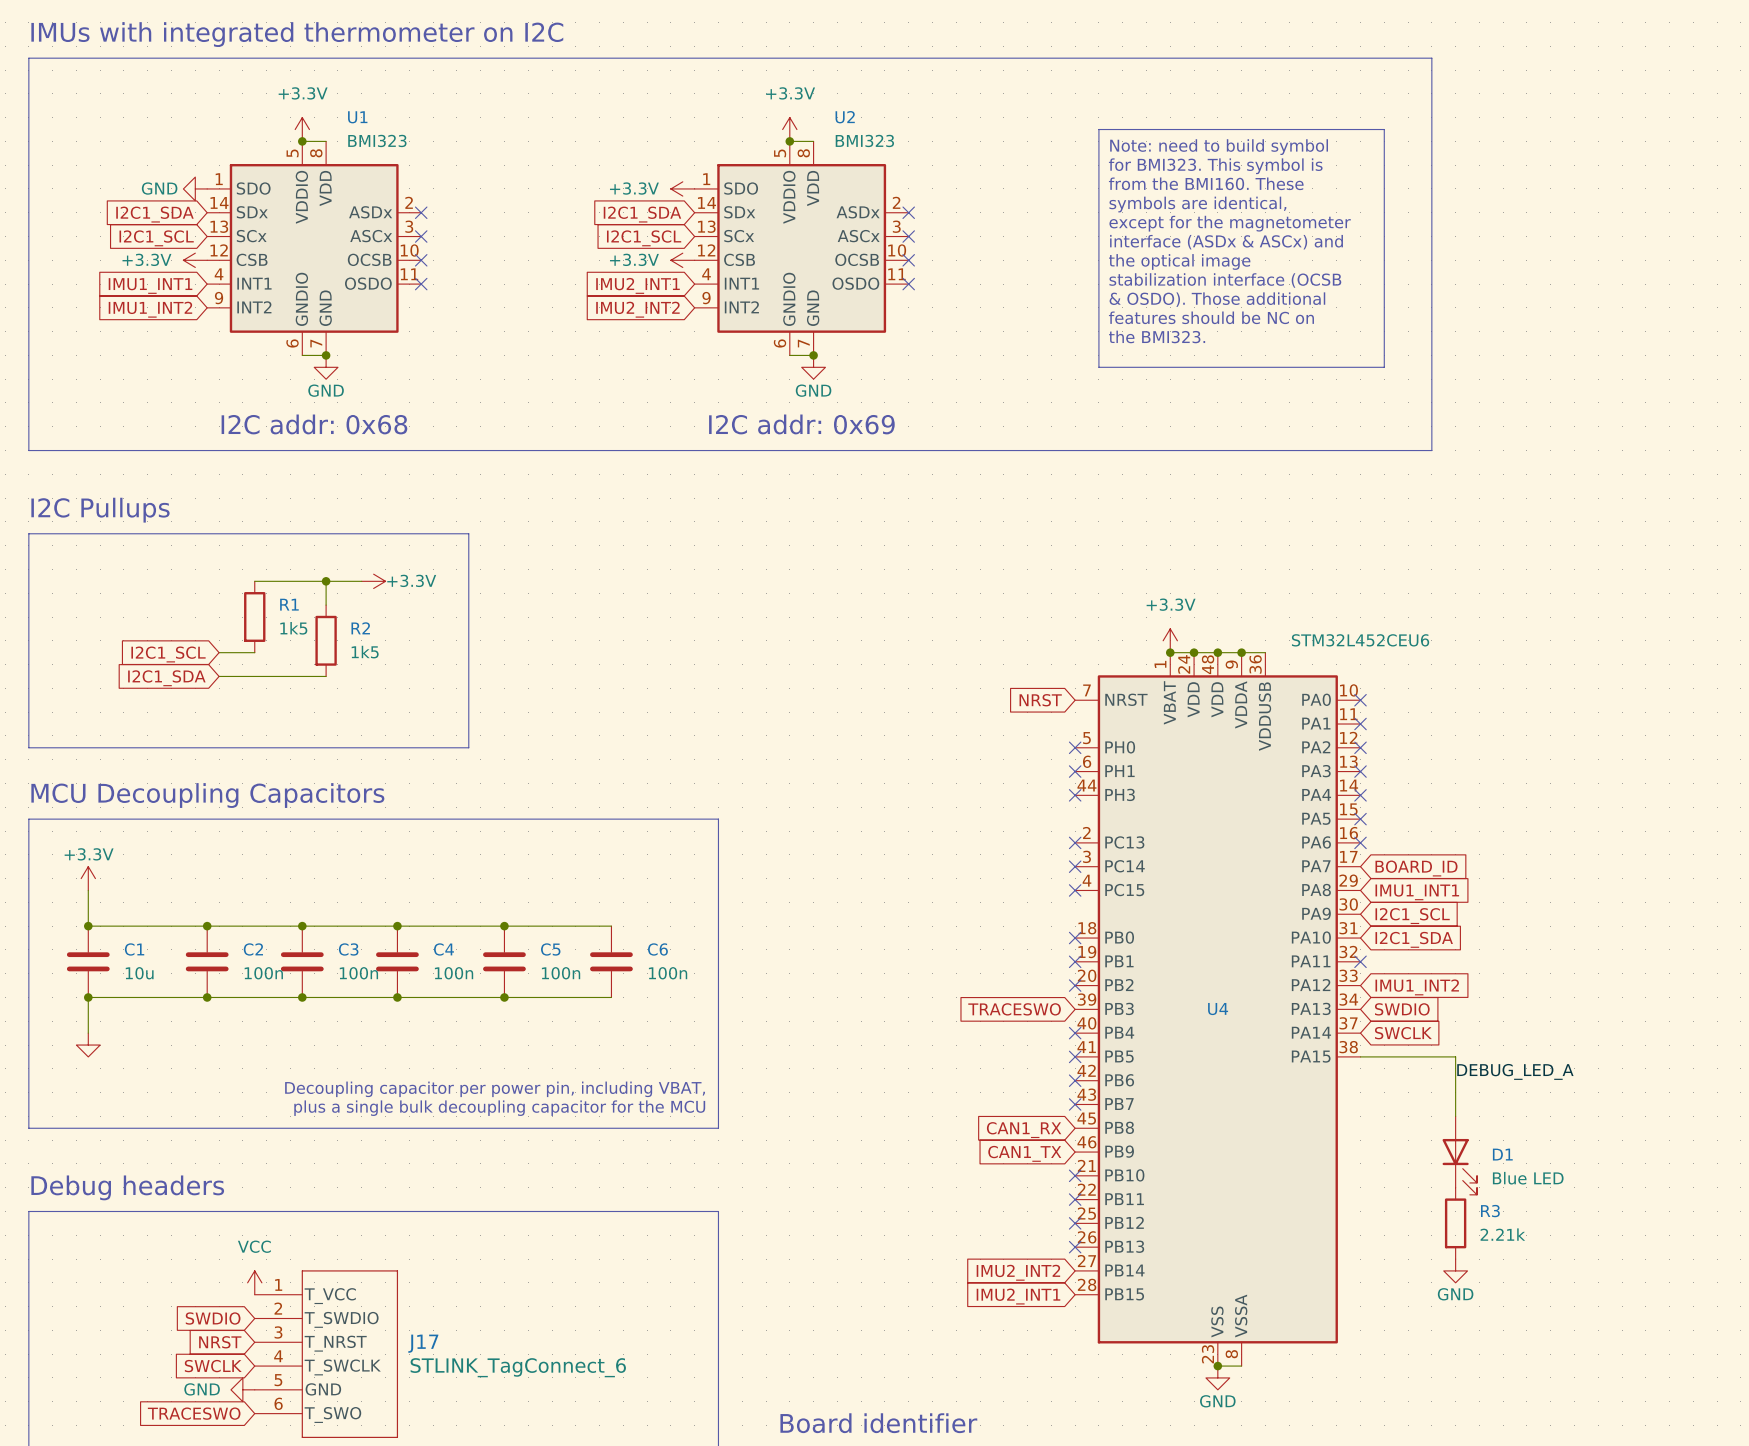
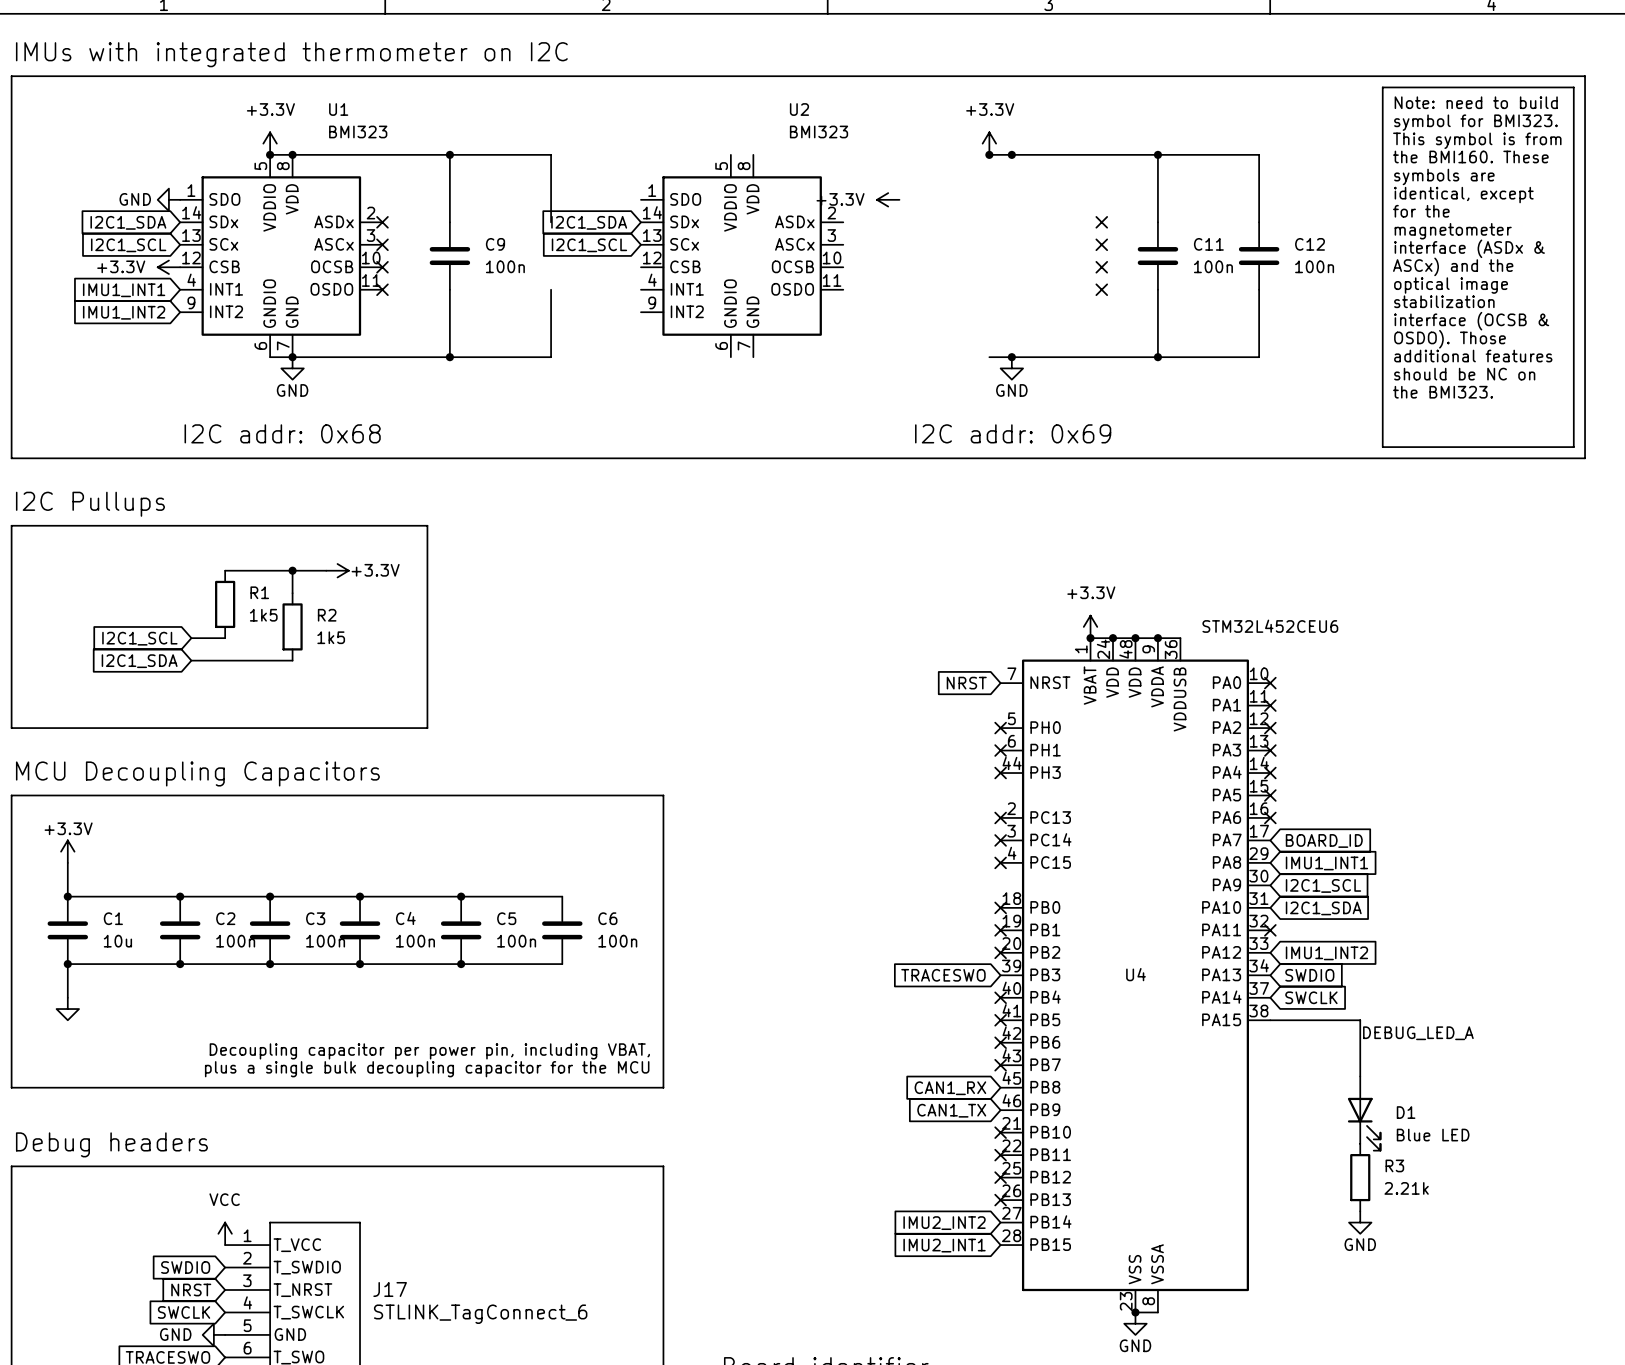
line: (1431, 58) (1431, 450) (28, 450) -> (1337, 76) (1585, 76) (1585, 458) (11, 458) (11, 447)
line: none -> (1382, 87) (1573, 87) (1573, 447) (1382, 447) (1382, 87)
text: none -> Note: need to build (1476, 102)
text: none -> symbol for BMI323. (1475, 122)
U1 name position: U1 (357, 117) -> U1 (338, 109)
U2 name position: U2 (845, 117) -> U2 (799, 109)
text: none -> This symbol is from (1477, 140)
power symbol: +3.3V (789, 129) -> none
power symbol: none -> +3.3V (989, 143)
line: (1098, 129) (1384, 129) (1384, 367) (1098, 367) (1098, 129) -> none
U1 value position: BMI323 (377, 140) -> BMI323 (358, 131)
U2 value position: BMI323 (864, 140) -> BMI323 (819, 131)
wire: none -> (292, 154) (551, 154) (551, 222)
junction: none -> (292, 154)
wire: none -> (449, 154) (449, 222)
junction: none -> (449, 154)
wire: (789, 141) (813, 141) -> none
junction: (789, 141) -> none
wire: none -> (989, 154) (1259, 154) (1259, 222)
junction: none -> (989, 154)
junction: none -> (1011, 154)
wire: none -> (1157, 154) (1157, 222)
junction: none -> (1157, 154)
text: none -> the BMI160. These (1470, 156)
text: Note: need to build symbol (1219, 147) -> none
text: none -> symbols are (1444, 176)
text: for BMI323. This symbol is (1215, 166) -> none
text: from the BMI160. These (1206, 183) -> none
text: none -> identical, except (1463, 195)
power symbol: +3.3V (682, 188) -> none
power symbol: none -> +3.3V (888, 199)
text: none -> for the (1421, 211)
text: symbols are identical, (1197, 204) -> none
no-connect mark: (908, 212) -> none
no-connect mark: none -> (1101, 222)
text: none -> magnetometer (1453, 231)
text: except for the magnetometer (1230, 223) -> none
no-connect mark: (908, 236) -> none
no-connect mark: none -> (1101, 244)
text: none -> interface (ASDx & (1469, 248)
text: interface (ASDx & ASCx) and (1226, 242) -> none
C9: none -> 100n (449, 256)
C11: none -> 100n (1157, 256)
C12: none -> 100n (1259, 256)
text: none -> ASCx) and the (1453, 266)
power symbol: +3.3V (682, 260) -> none
no-connect mark: (908, 260) -> none
no-connect mark: none -> (1101, 267)
text: the optical image (1179, 261) -> none
text: none -> optical image (1451, 285)
text: stabilization interface (OCSB (1225, 280) -> none
wire: none -> (449, 289) (449, 357)
wire: none -> (551, 289) (551, 357) (292, 357)
no-connect mark: (908, 284) -> none
no-connect mark: none -> (1101, 289)
wire: none -> (1157, 289) (1157, 357)
wire: none -> (1259, 289) (1259, 357) (989, 357)
global label: IMU2_INT1 (638, 285) -> none
text: none -> stabilization (1444, 301)
text: & OSDO). Those additional (1217, 299) -> none
global label: IMU2_INT2 (637, 309) -> none
text: none -> interface (OCSB & (1471, 321)
text: features should be NC on (1211, 317) -> none
text: none -> OSDO). Those (1449, 339)
text: the BMI323. (1157, 336) -> none
text: none -> additional features (1473, 356)
junction: none -> (449, 357)
wire: (789, 355) (813, 355) -> none
junction: (813, 355) -> none
junction: none -> (1011, 357)
junction: none -> (1157, 357)
power symbol: GND (813, 367) -> none
power symbol: none -> GND (1011, 368)
text: none -> should be NC on (1464, 374)
text: none -> the BMI323. (1443, 392)
text position: I2C addr: 0x68 (314, 424) -> I2C addr: 0x68 (282, 433)
text: I2C addr: 0x69 (801, 424) -> none
text: none -> I2C addr: 0x69 (1013, 433)

